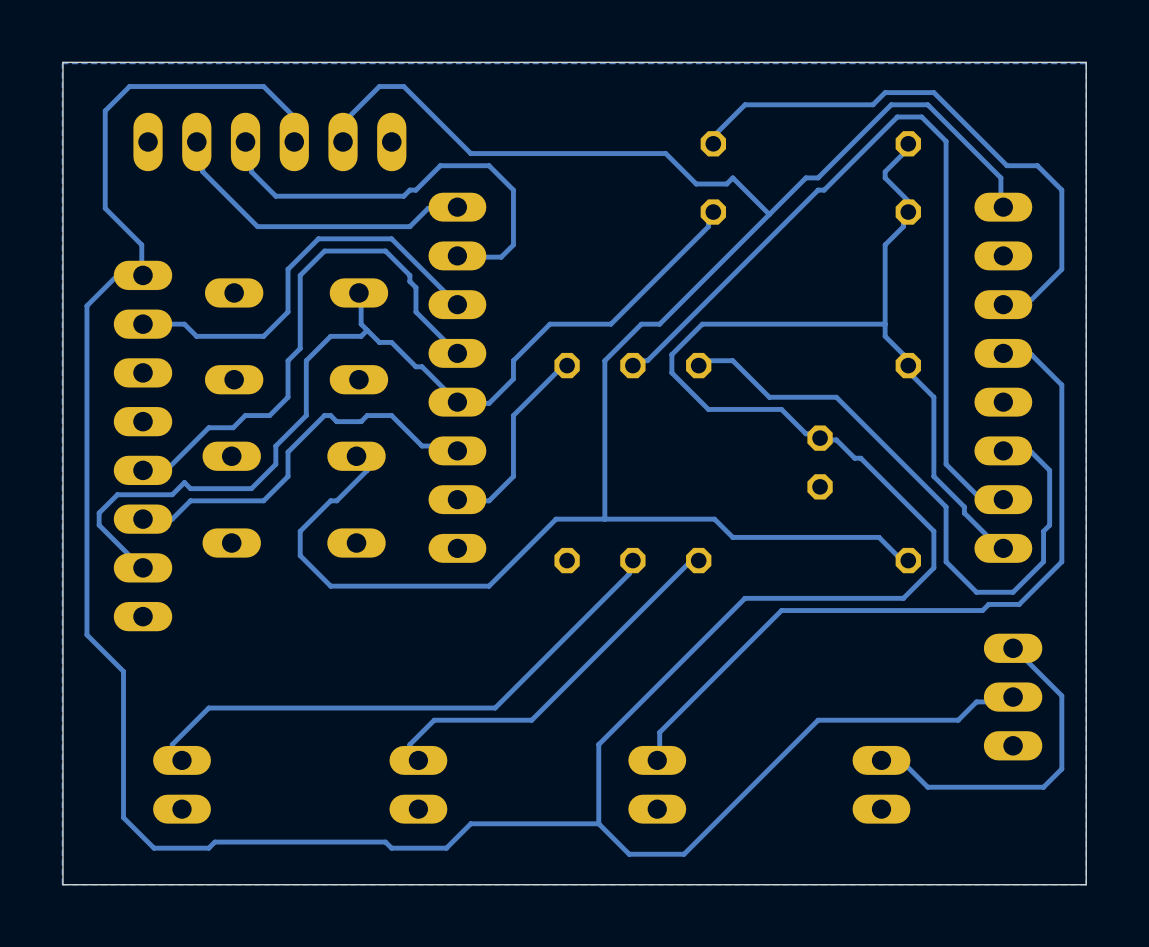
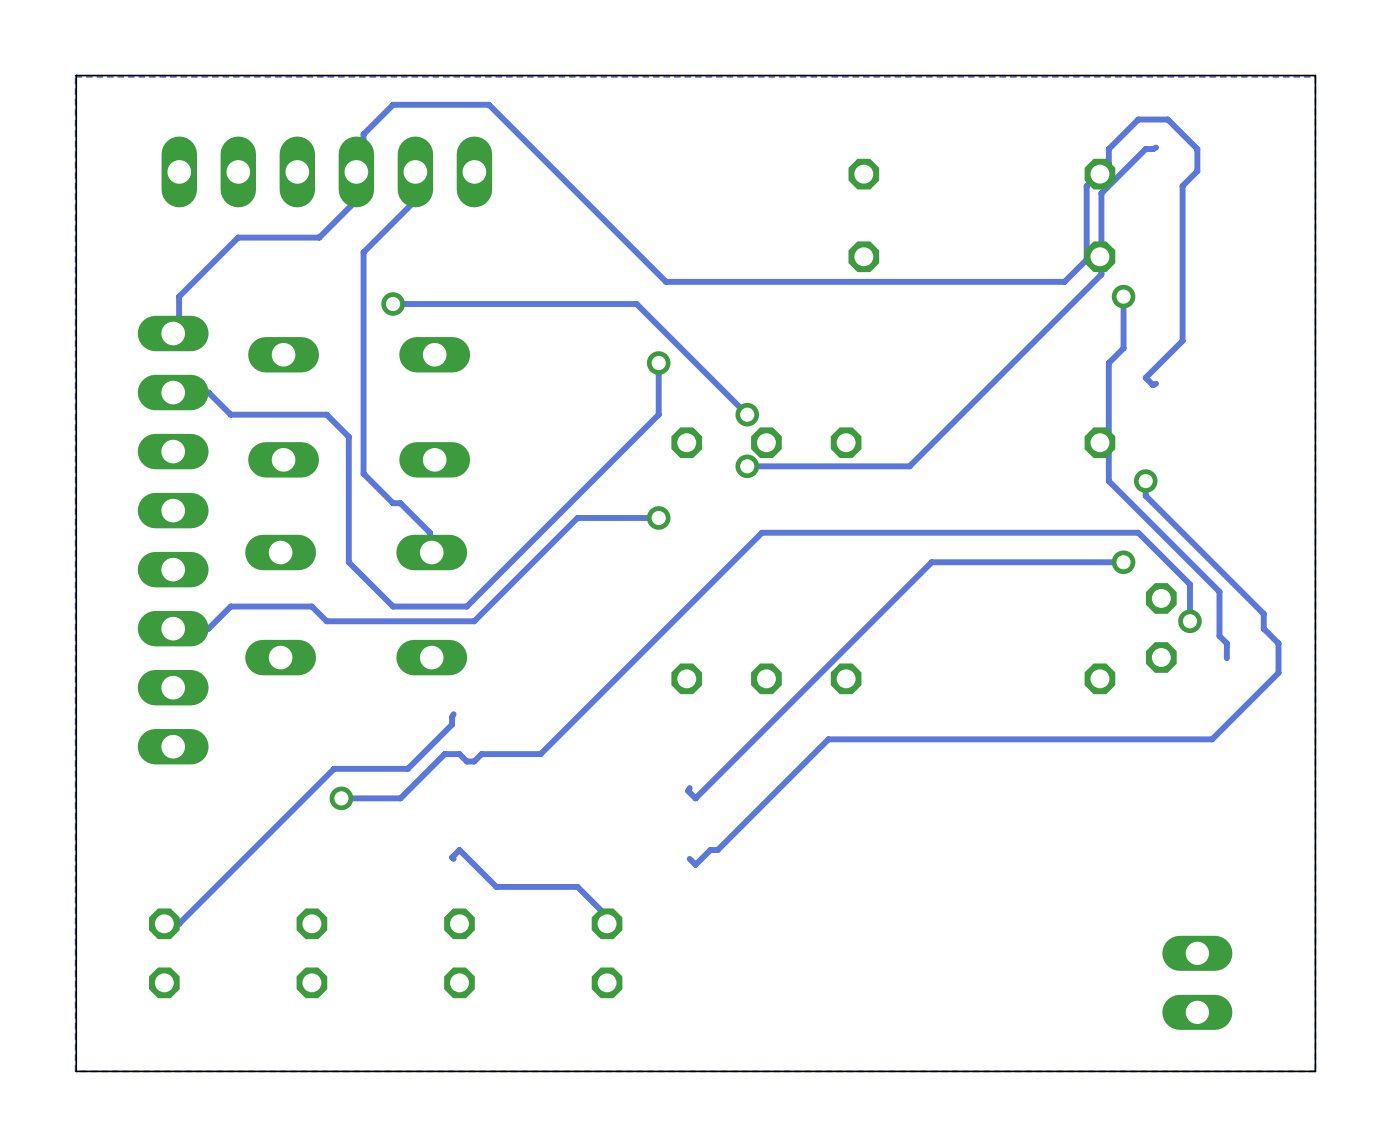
track: (379, 86) (348, 116) (348, 141) (343, 141) -> (459, 104) (393, 104) (363, 134) (363, 171) (356, 171) (356, 200) (319, 237) (238, 237) (179, 296) (179, 333) (173, 333)
track: (196, 141) (202, 147) (202, 171) (257, 226) (409, 226) (428, 208) (457, 207) -> none
track: (245, 141) (251, 147) (251, 171) (275, 196) (403, 196) (409, 190) (415, 190) (440, 165) (489, 165) (513, 190) (513, 244) (501, 257) (457, 255) -> none
track: (294, 141) (294, 116) (263, 86) (129, 86) (105, 110) (105, 208) (141, 244) (141, 275) -> none
track: (713, 143) (714, 135) (745, 104) (872, 104) (885, 92) (933, 92) (1007, 165) (1037, 165) (1061, 190) (1061, 269) (1031, 299) (1007, 299) (1003, 304) -> none
track: (908, 143) (903, 147) (903, 153) (885, 171) (885, 177) (909, 202) -> (1156, 147) (1145, 149) (1101, 193) (1101, 244)
track: (470, 153) (665, 153) (696, 184) (726, 184) (732, 177) (769, 214) -> (570, 185) (666, 281) (1064, 281) (1086, 259) (1086, 185) (1108, 163) (1108, 149) (1138, 119) (1167, 119) (1197, 149) (1197, 171) (1182, 185) (1182, 340) (1145, 377) (1153, 385) (1156, 383)
track: (1003, 207) (1000, 202) (1000, 177) (927, 104) (891, 104) (818, 177) (805, 177) (659, 324) (641, 324) (604, 360) (604, 519) -> none
track: (909, 208) (908, 212) (903, 214) (903, 226) (885, 244) (885, 336) (903, 354) (903, 360) (908, 365) (903, 366) (933, 397) (933, 476) (964, 506) (964, 513) (994, 543) (1000, 543) (1003, 548) -> (1101, 252) (1101, 274) (909, 466) (747, 466)
track: (713, 212) (708, 214) (708, 226) (610, 324) (550, 324) (513, 360) (513, 378) (489, 403) (458, 403) (422, 366) (415, 366) (391, 342) (379, 342) (361, 324) (361, 293) (358, 292) -> none
track: none -> (1123, 296) (1123, 348) (1108, 363) (1108, 481) (1219, 591) (1219, 636) (1226, 643) (1226, 658)
via: none -> (1123, 296)
track: (324, 251) (300, 275) -> (415, 171) (415, 200) (363, 252) (363, 333)
via: none -> (393, 304)
track: (385, 251) (409, 275) (409, 281) (415, 287) (415, 311) (457, 353) -> (466, 304) (636, 304) (747, 414)
track: (143, 275) (117, 275) (86, 305) (86, 634) (123, 671) (123, 817) (153, 848) (208, 848) (214, 842) (385, 842) (391, 848) (446, 848) (470, 823) (598, 823) -> none
track: none -> (658, 363) (658, 414) (466, 606) (407, 606)
via: none -> (658, 363)
track: (457, 304) (391, 238) (318, 238) (288, 269) (288, 311) (263, 336) (196, 336) (184, 324) (172, 324) -> (348, 436) (326, 414) (230, 414) (208, 392)
track: (885, 324) (702, 324) (671, 354) (671, 372) (708, 409) (781, 409) (805, 433) (818, 433) (820, 438) (824, 439) -> (341, 798) (400, 798) (444, 754) (459, 754) (466, 761) (474, 761) (481, 754) (540, 754) (762, 532) (998, 532)
track: (367, 330) (361, 336) (330, 336) (306, 360) (306, 415) (275, 446) (275, 464) (251, 488) (190, 488) (184, 482) (172, 494) (117, 494) (99, 513) (99, 525) (143, 567) -> none
via: none -> (747, 414)
track: (300, 348) (288, 360) -> (363, 422) (363, 473) (393, 503)
track: (1003, 353) (1031, 354) (1061, 385) (1061, 561) (1019, 604) (988, 604) (982, 610) -> (1145, 495) (1263, 613) (1263, 628) (1278, 643) (1278, 672) (1212, 739) (1189, 739)
track: (567, 365) (562, 366) (513, 415) (513, 476) (489, 500) (457, 499) -> none
track: (632, 365) (635, 360) (647, 360) (818, 190) (824, 190) (897, 116) (921, 116) (946, 141) (946, 397) -> none
track: (698, 365) (702, 360) (732, 360) (769, 397) (836, 397) (946, 506) (946, 561) (976, 592) (1013, 592) (1043, 561) (1043, 531) (1049, 525) (1049, 470) (1031, 452) (1003, 450) -> none
part: (457, 377) -> none
part: (1003, 377) -> none
via: none -> (747, 466)
track: (288, 397) (269, 415) (245, 415) (233, 427) (208, 427) (166, 470) (143, 470) -> none
via: none -> (1145, 481)
track: (946, 409) (946, 464) (976, 494) (1000, 494) (1003, 499) -> none
track: (324, 415) (288, 452) -> (348, 481) (348, 547)
track: (336, 421) (361, 421) (367, 415) (391, 415) (422, 446) (452, 446) (457, 450) -> none
track: none -> (658, 517) (577, 517) (474, 621) (326, 621) (311, 606)
via: none -> (658, 517)
track: (836, 439) (854, 458) (860, 458) (933, 531) (933, 567) (903, 598) (745, 598) (598, 744) (598, 823) -> (1012, 532) (1138, 532) (1189, 584) (1189, 621)
track: (356, 456) (367, 464) (367, 470) (336, 500) -> (431, 552) (429, 532) (407, 510)
part position: (820, 462) -> (1161, 627)
track: (288, 464) (288, 476) (263, 500) (257, 500) -> (348, 562) (393, 606) (400, 606)
track: none -> (1123, 562) (931, 562) (695, 798) (688, 791) (689, 788)
via: none -> (1123, 562)
track: (330, 500) (300, 531) (300, 555) (330, 586) (489, 586) (556, 519) (714, 519) (732, 537) (879, 537) (897, 555) (903, 555) (908, 560) -> none
via: none -> (1189, 621)
track: (632, 560) (629, 561) (629, 573) (495, 708) (208, 708) (172, 744) (172, 750) (182, 760) -> none
track: (698, 560) (690, 561) (531, 720) (434, 720) (409, 744) (409, 750) (418, 760) -> none
track: none -> (453, 714) (452, 724) (407, 768) (334, 768) (179, 923) (164, 923)
track: (781, 610) (659, 732) (659, 756) (657, 760) -> (946, 739) (828, 739) (717, 850) (710, 850) (695, 864) (689, 858)
track: (1013, 648) (1061, 695) (1061, 768) (1043, 787) (927, 787) (903, 762) (885, 762) (881, 760) -> none
via: none -> (341, 798)
track: (1013, 697) (1013, 701) (976, 701) (958, 720) (818, 720) (684, 854) (629, 854) (598, 823) -> none
part: (1013, 697) -> none
track: none -> (453, 858) (452, 857) (459, 850) (496, 886) (577, 886) (607, 916) (607, 923)
part: (182, 784) -> none
part: (418, 784) -> none
part: (657, 784) -> none
part position: (881, 784) -> (1197, 982)
part: none -> (164, 953)
part: none -> (311, 953)
part: none -> (459, 953)
part: none -> (607, 953)

